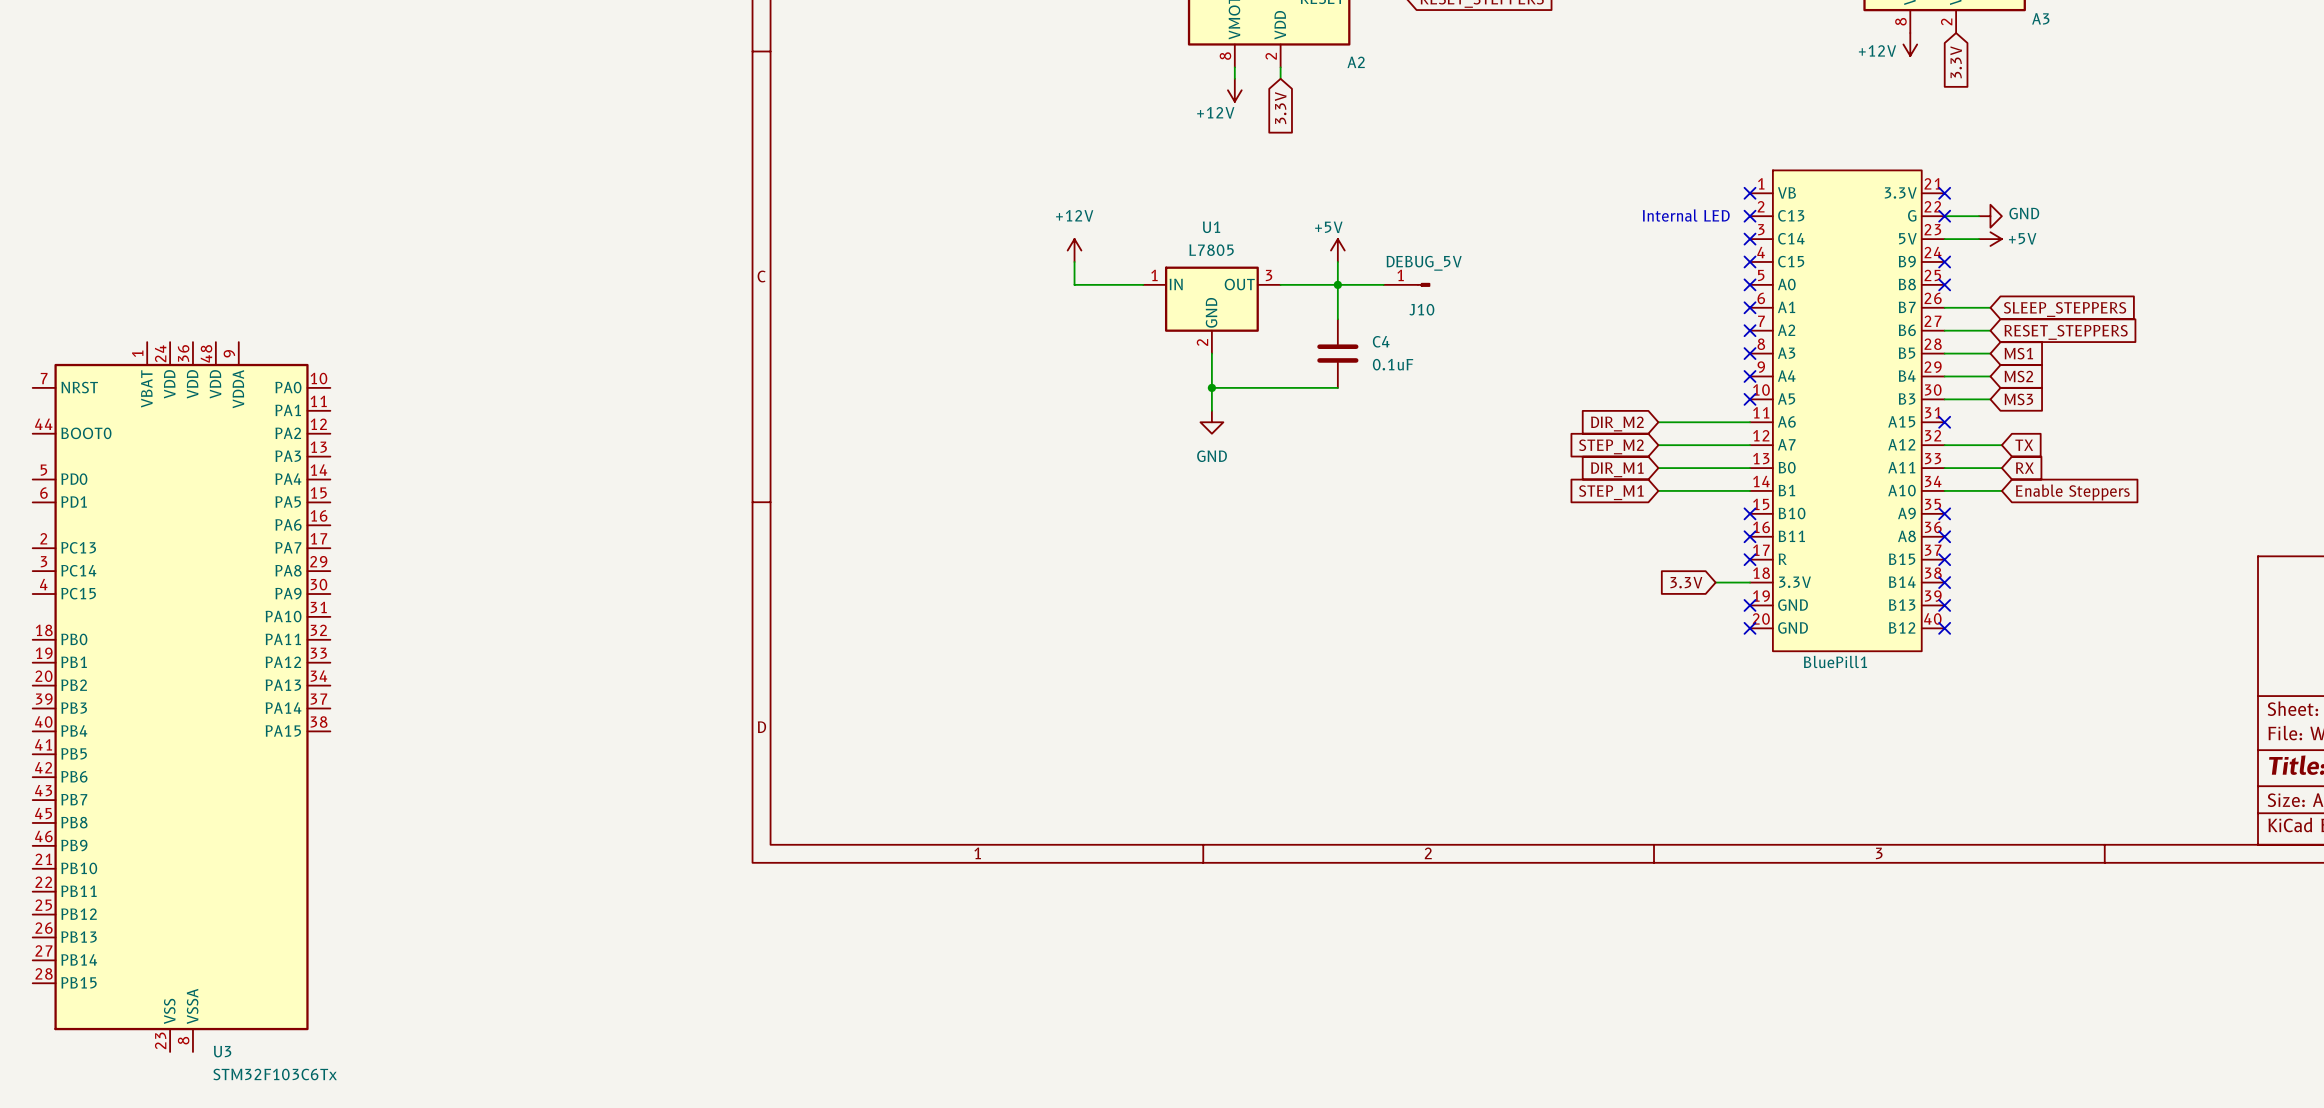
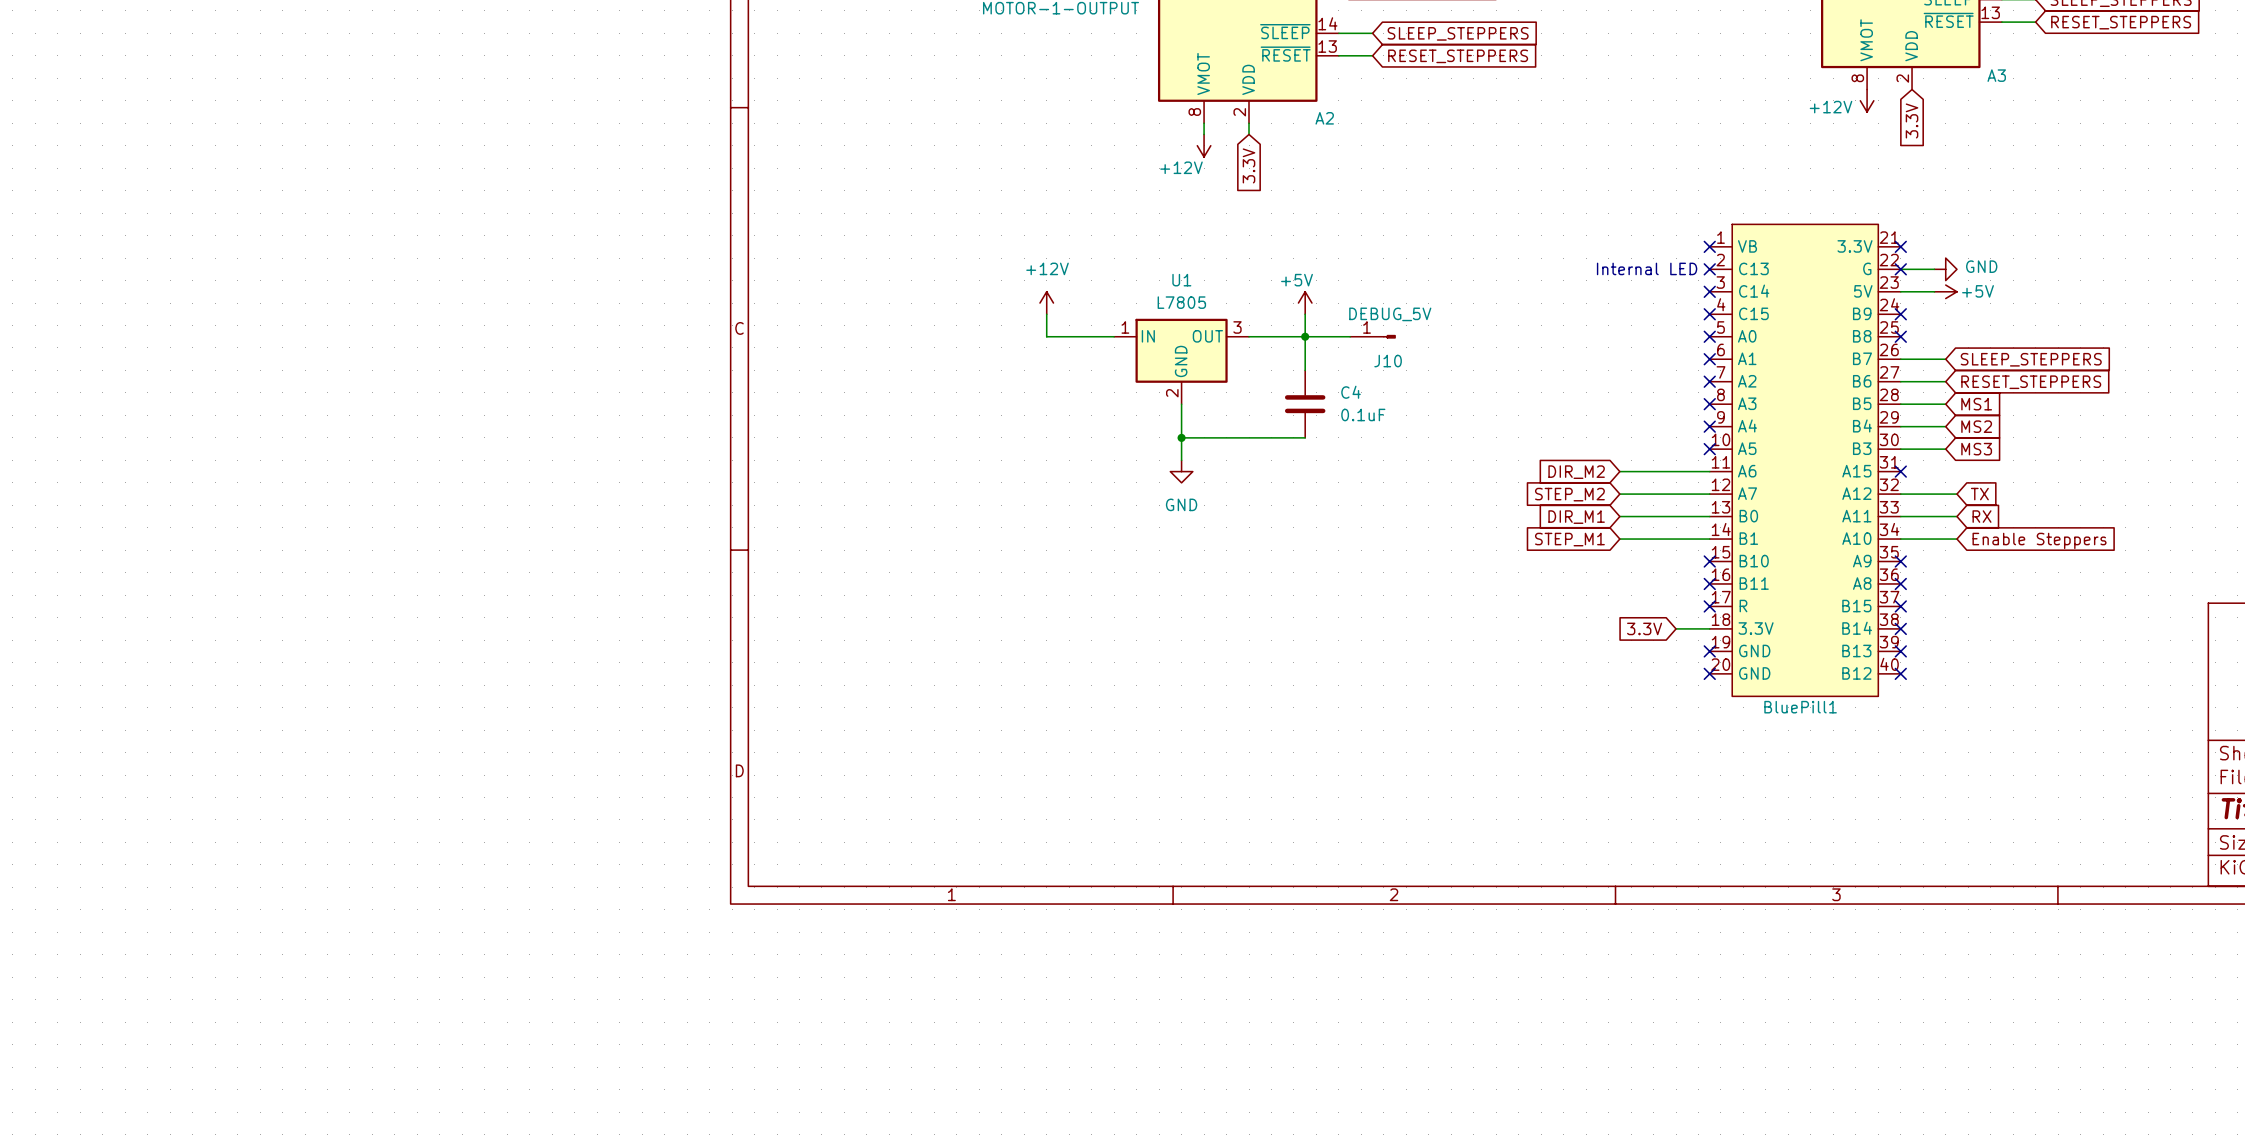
U3: STM32F103C6Tx (181, 697) -> none

